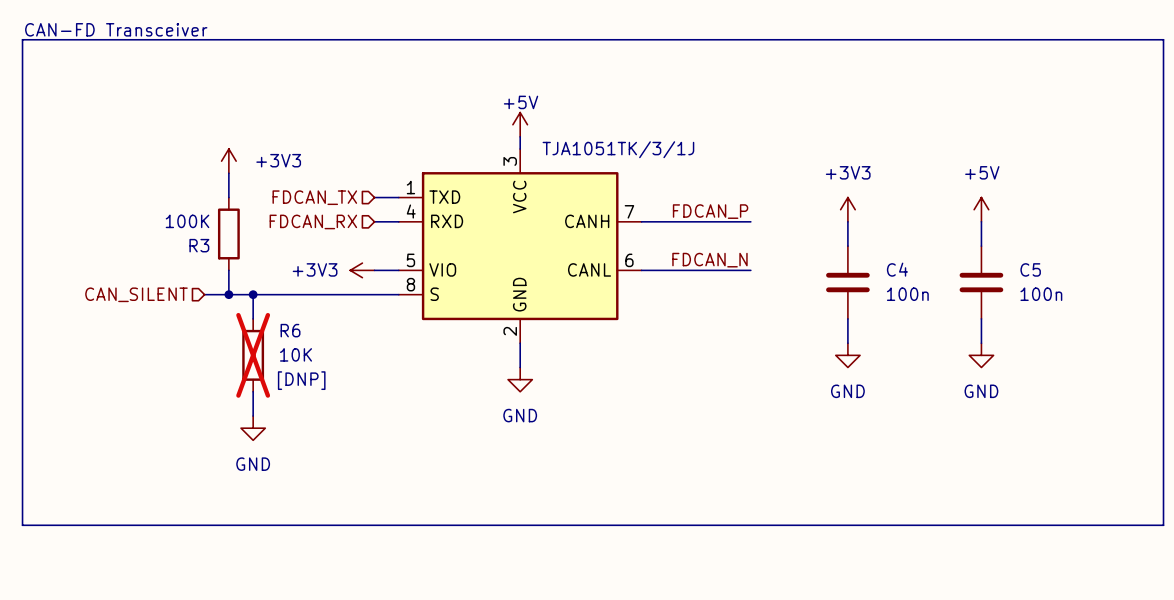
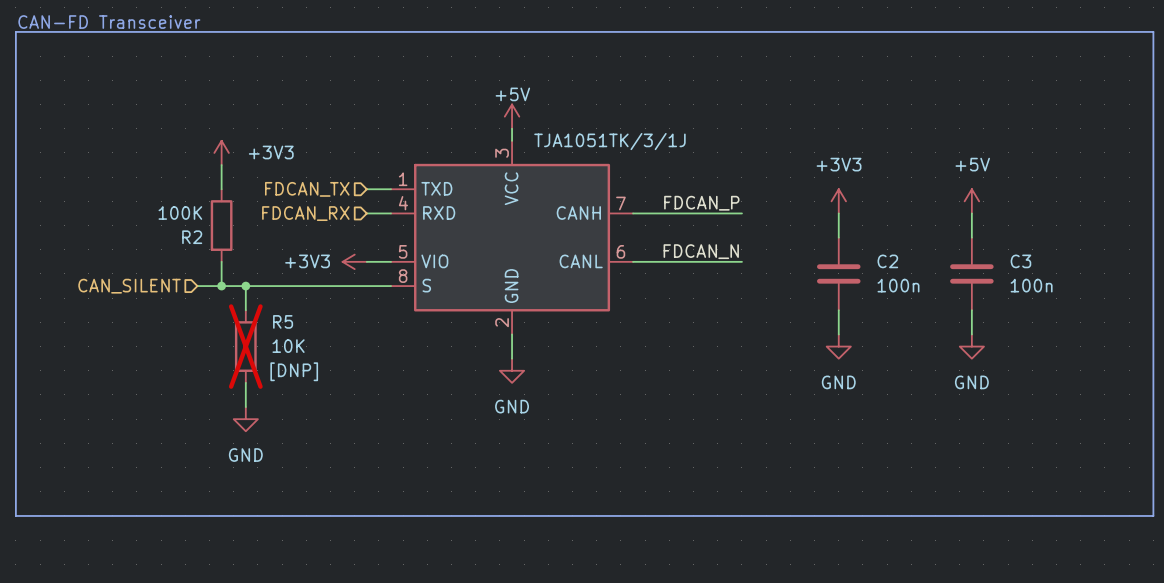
R3 name: R3 (199, 245) -> R2 (192, 237)
C4 name: C4 (897, 269) -> C2 (887, 261)
C5 name: C5 (1030, 269) -> C3 (1020, 261)
R6 name: R6 (290, 330) -> R5 (283, 321)

